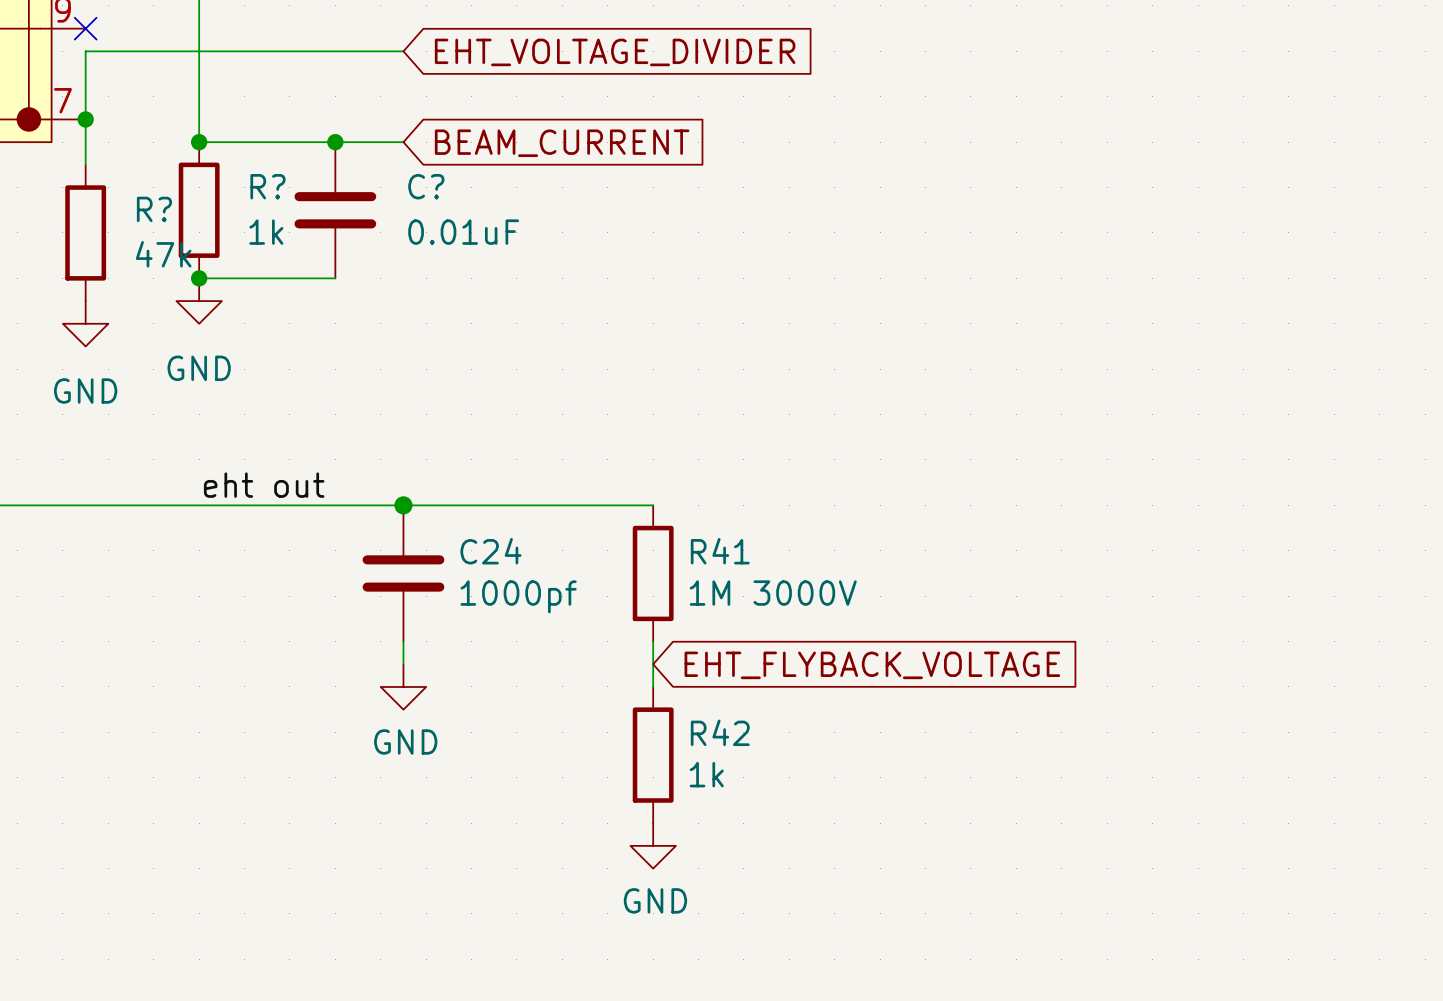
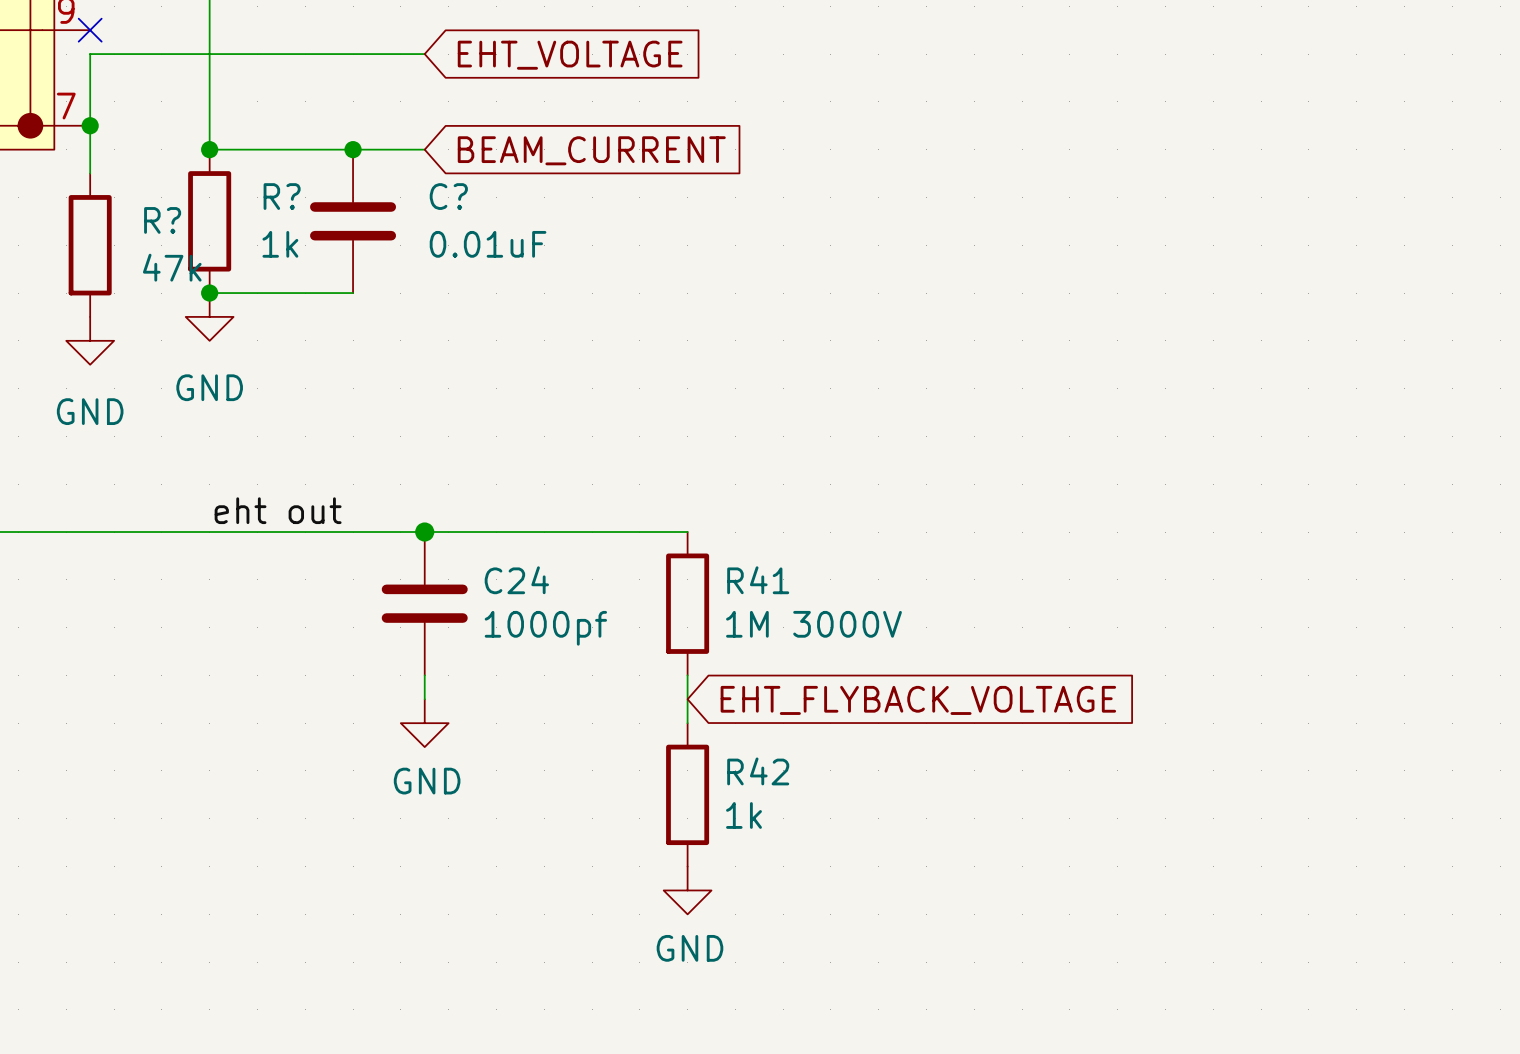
global label: EHT_VOLTAGE_DIVIDER (615, 52) -> EHT_VOLTAGE (570, 55)

